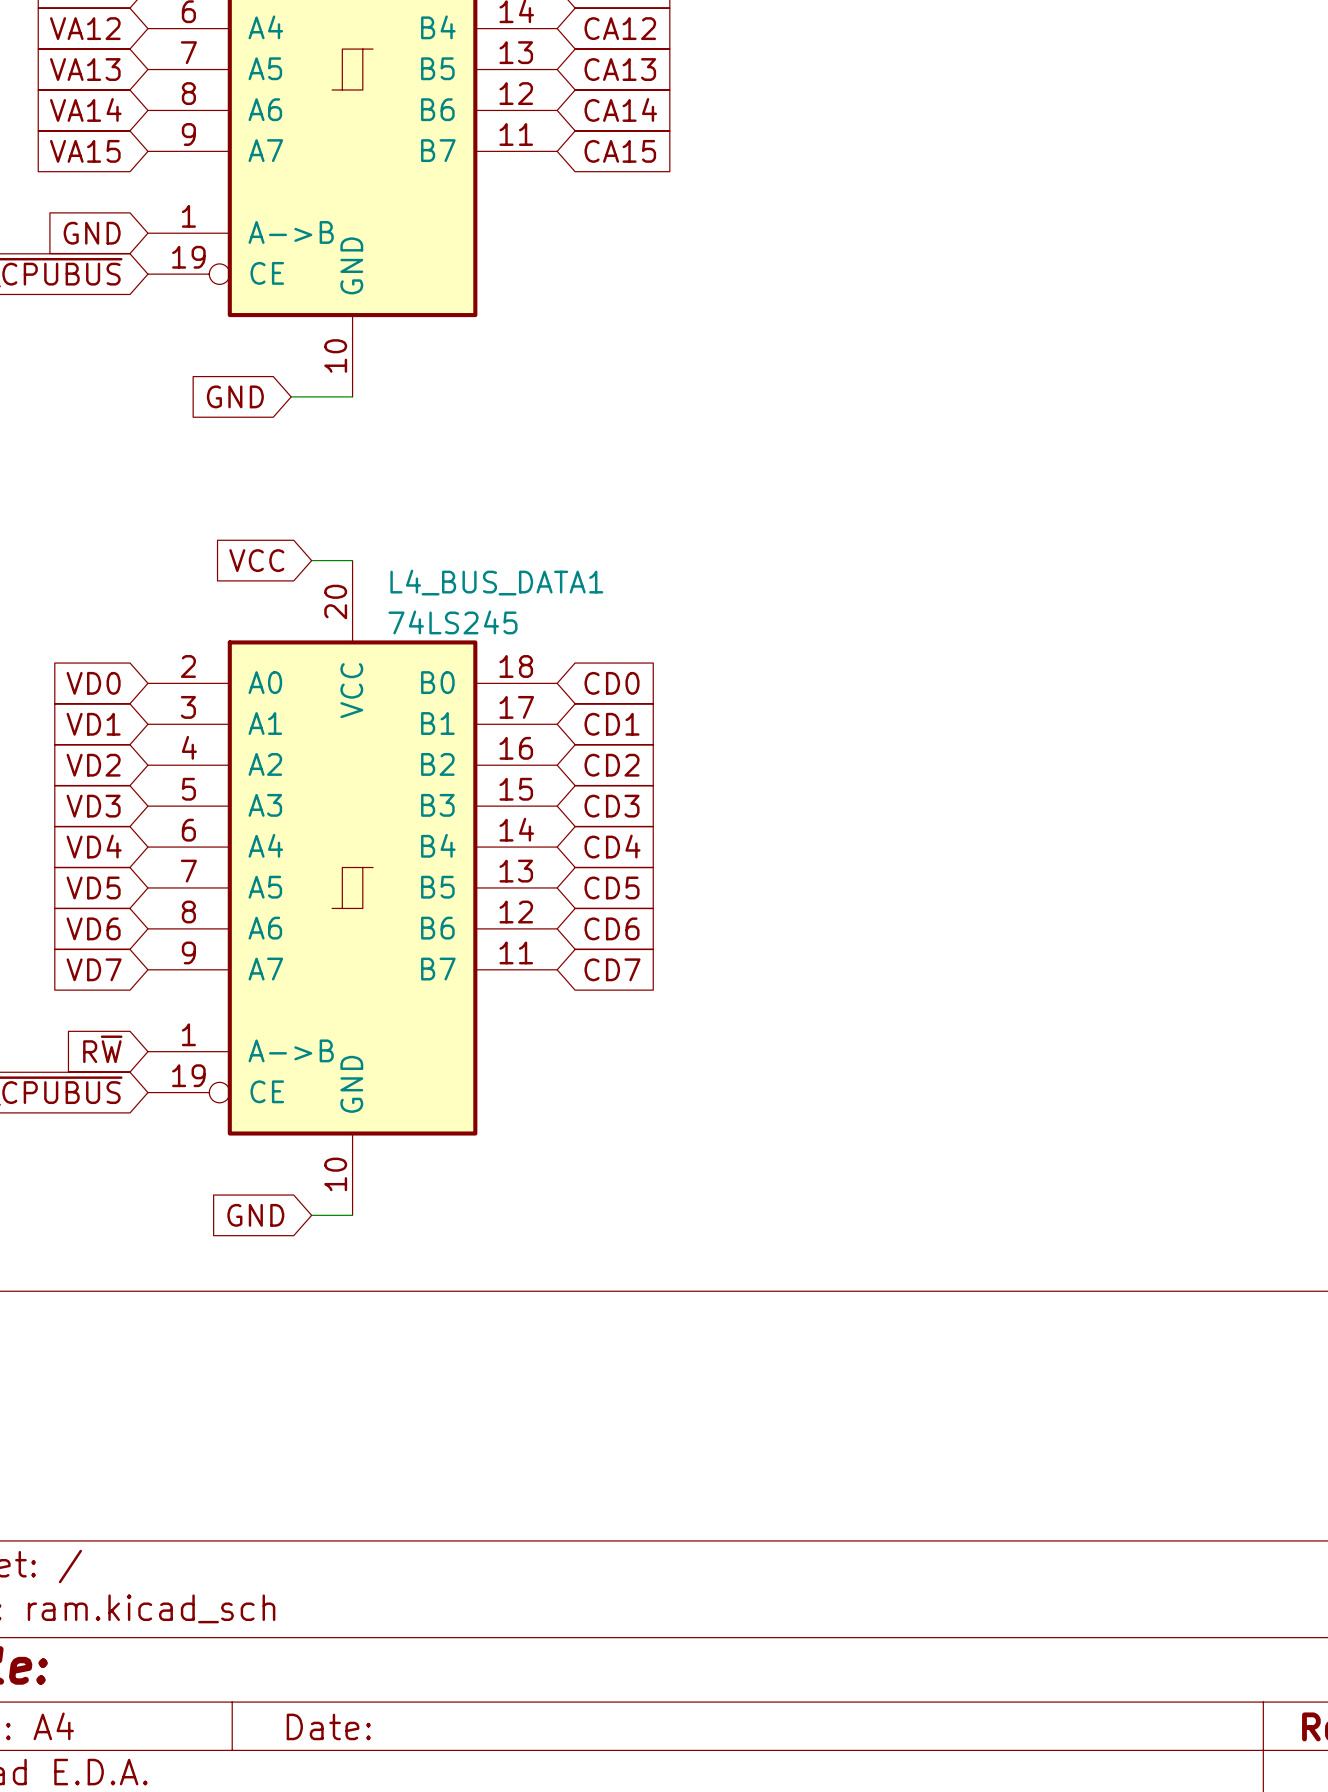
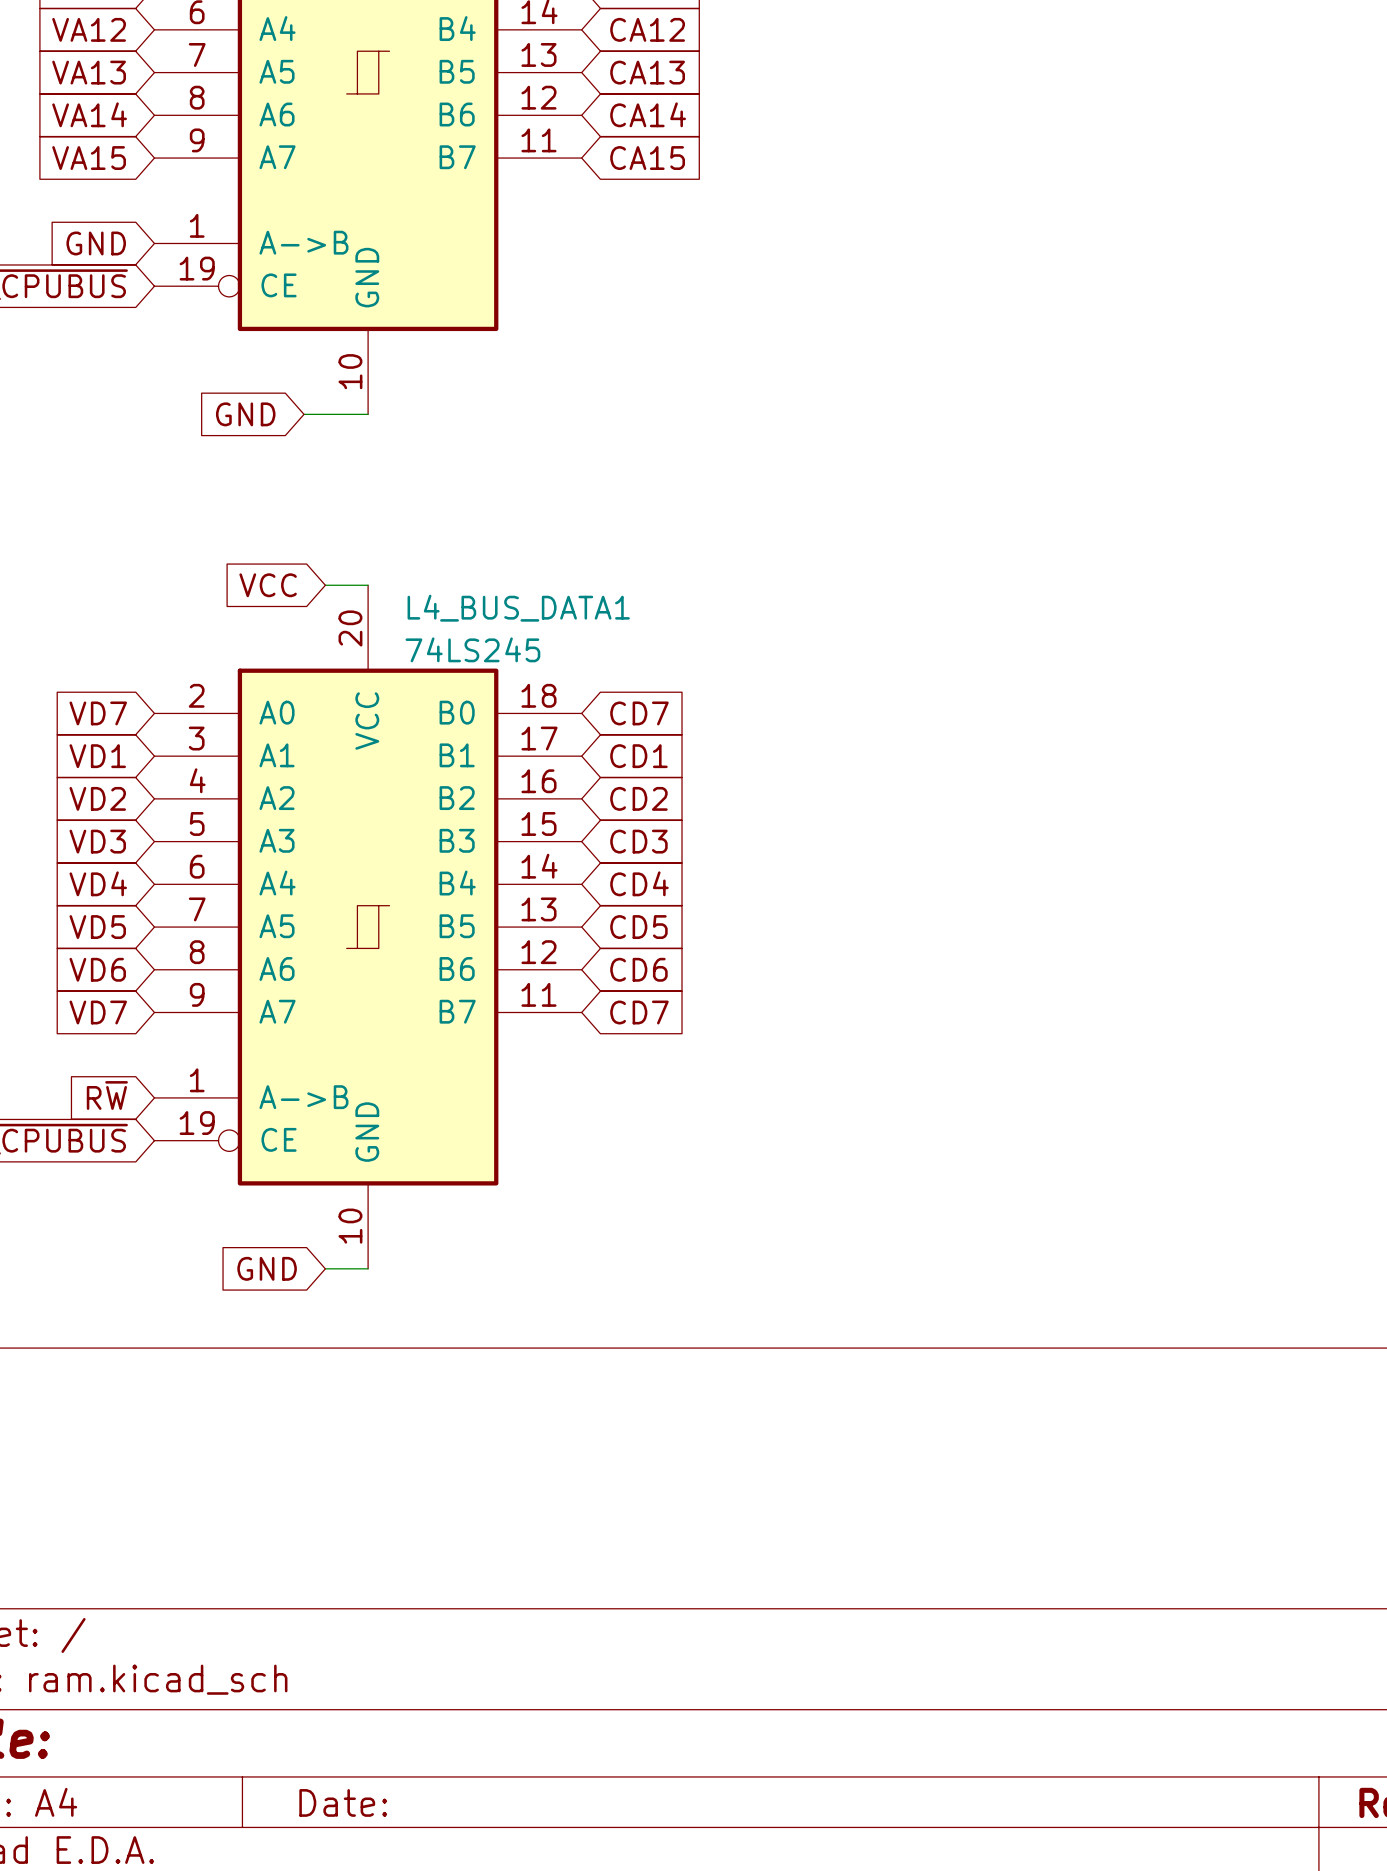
global label: VD0 (93, 683) -> VD7 (98, 713)
global label: CD0 (612, 683) -> CD7 (639, 713)

